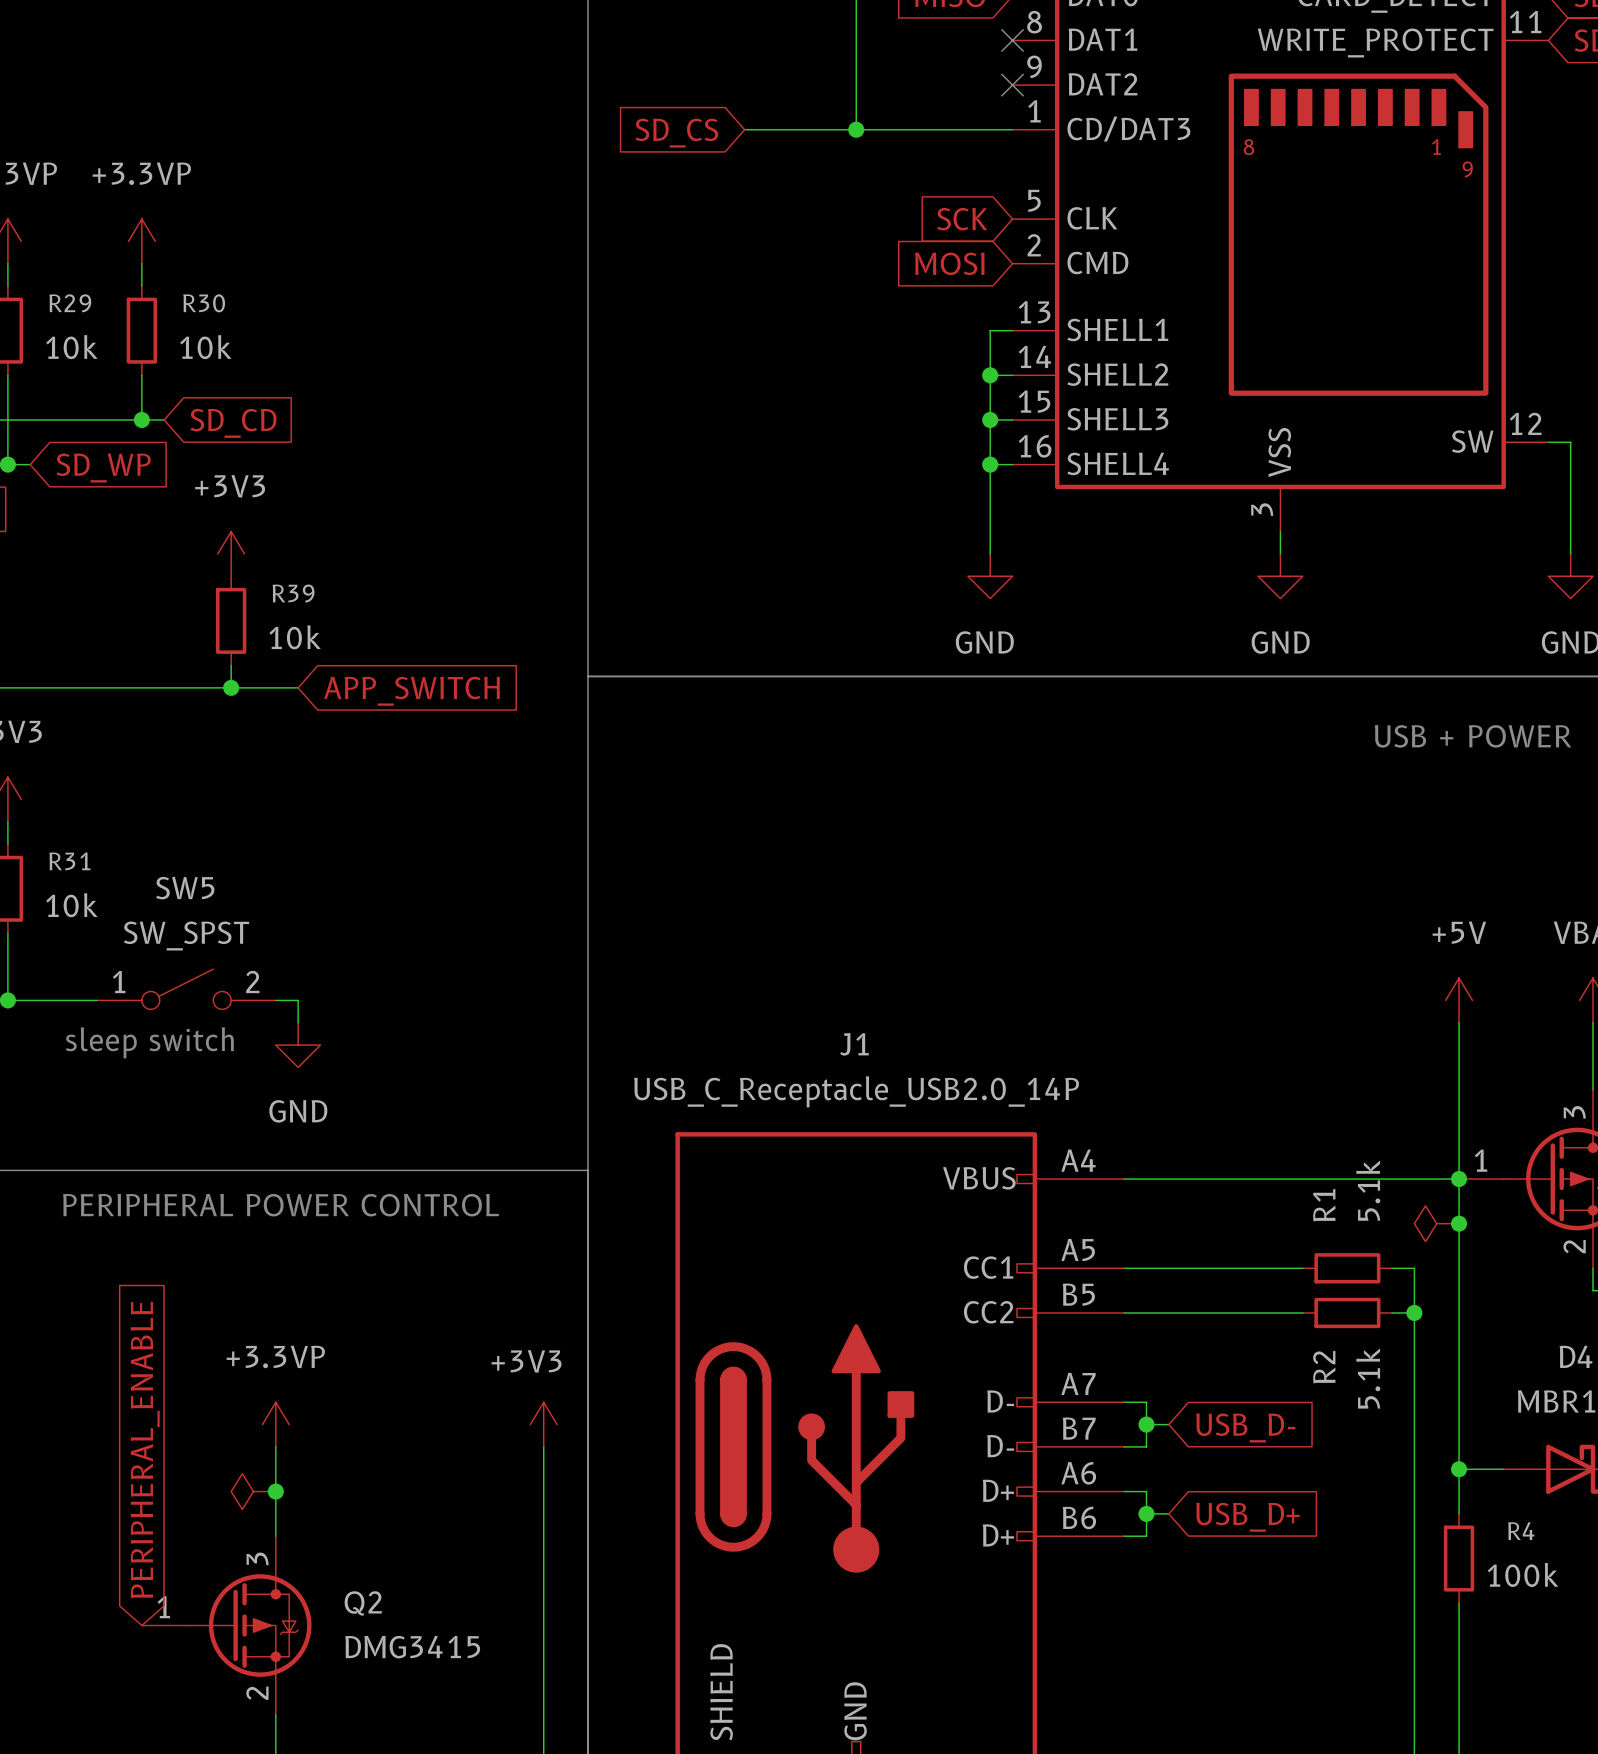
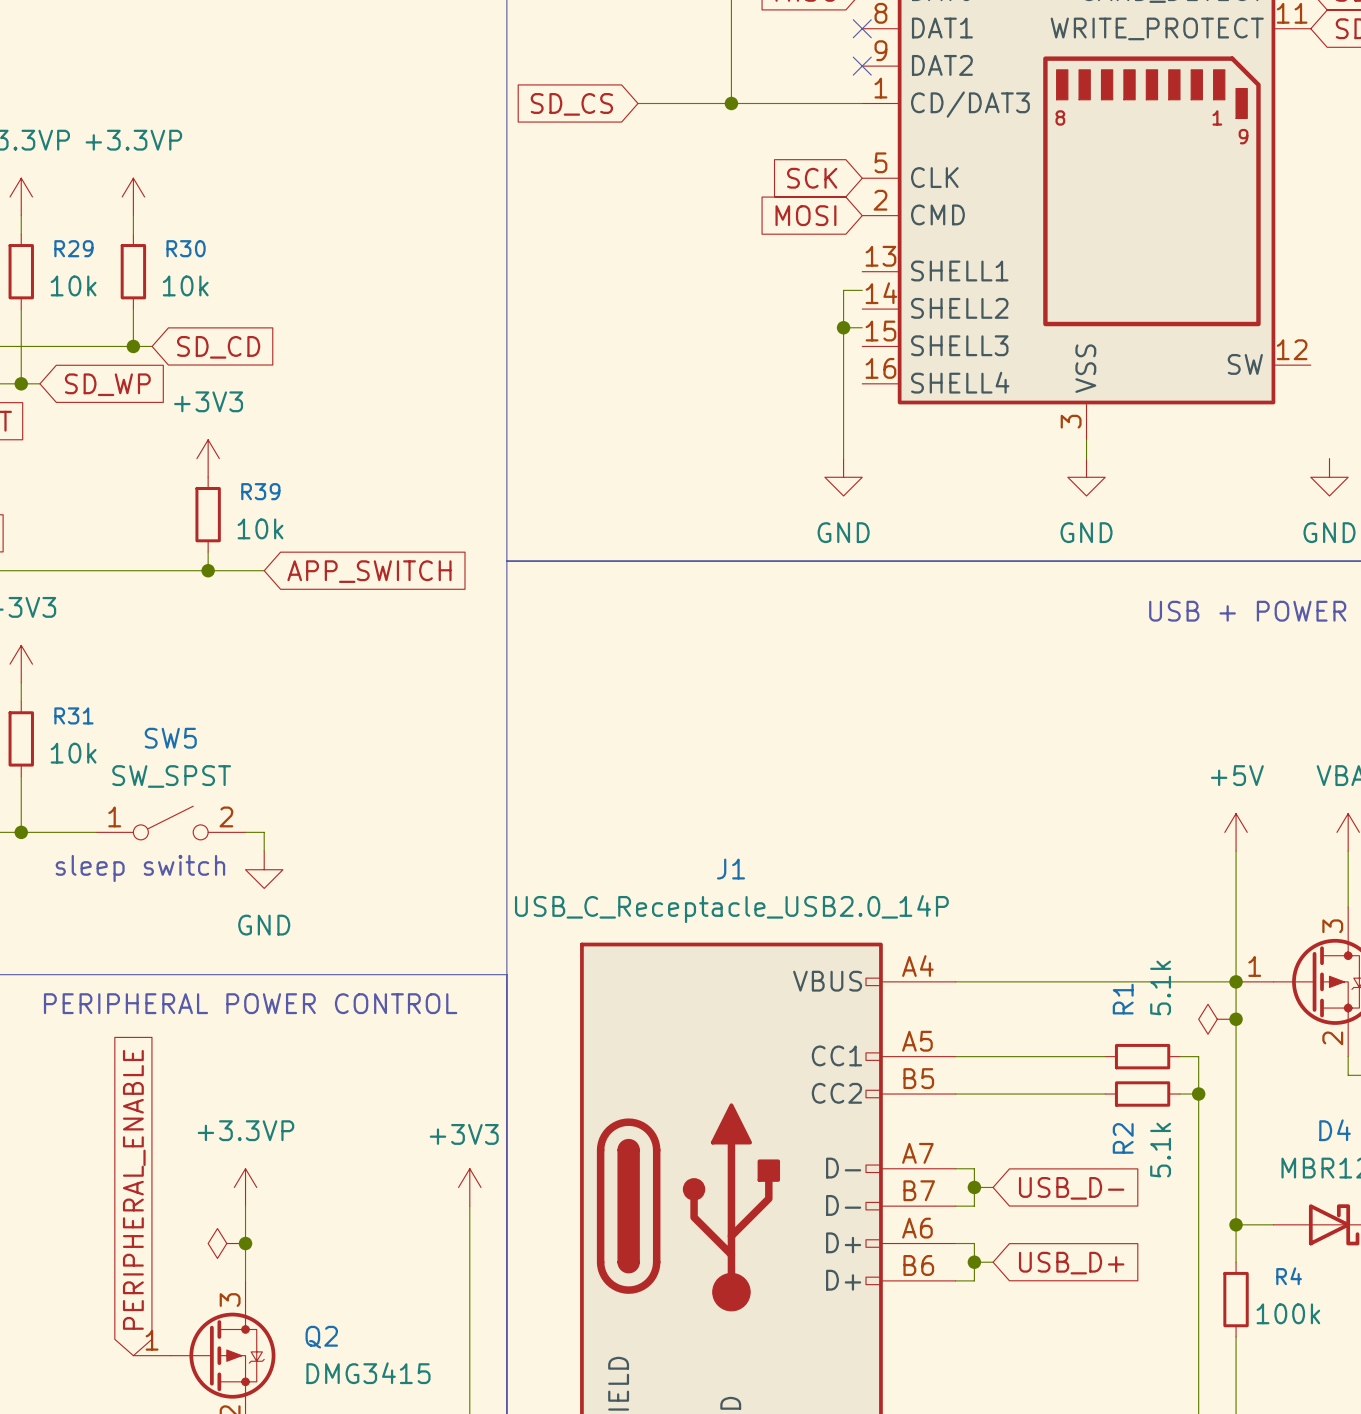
wire: (1012, 330) (990, 330) (990, 353) -> (862, 290) (843, 290)
wire: (990, 375) (1012, 375) -> none
junction: (990, 375) -> none
junction: none -> (843, 327)
wire: (990, 419) (1012, 419) -> (843, 327) (862, 327)
junction: (990, 419) -> none
wire: (1548, 442) (1570, 442) (1570, 553) -> none
wire: (990, 464) (1012, 464) -> none
junction: (990, 464) -> none

